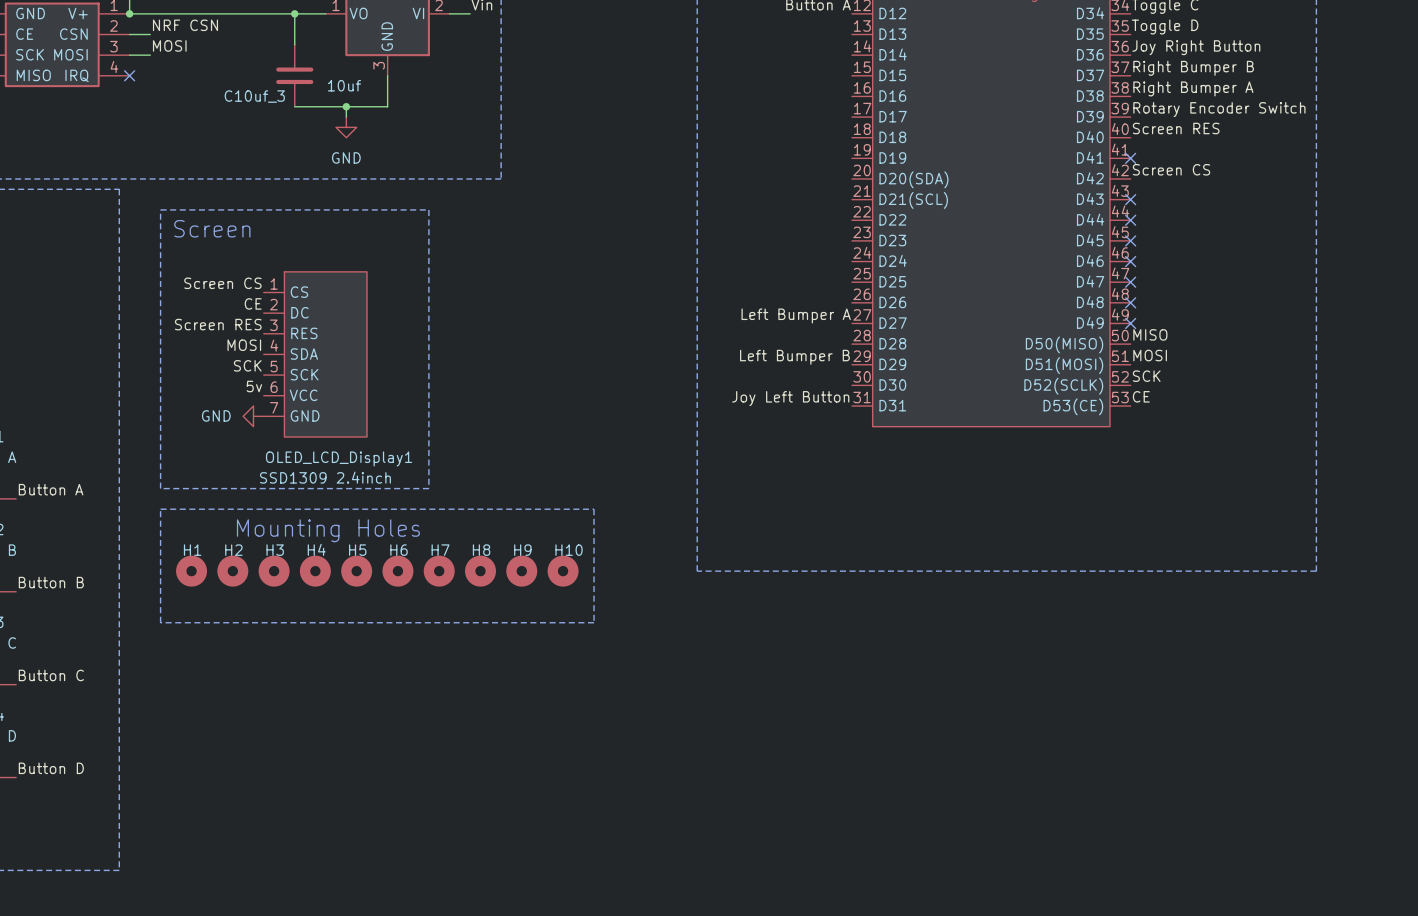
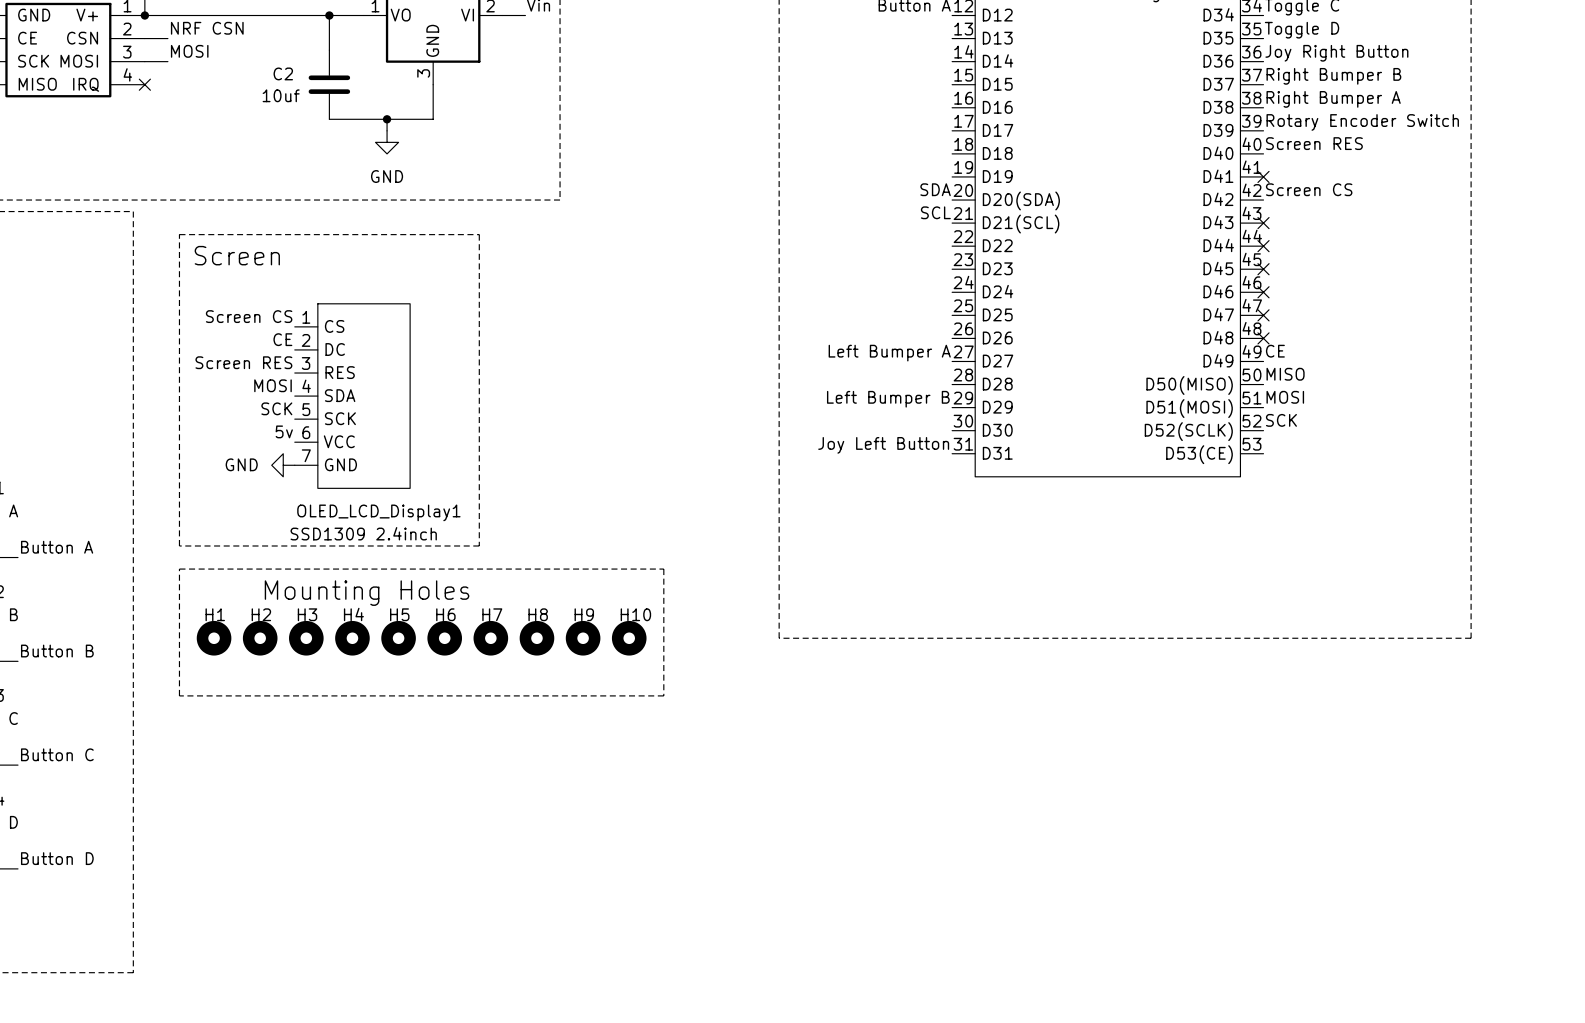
C10uf_3 value position: 10uf (344, 85) -> 10uf (281, 95)
C10uf_3 name: C10uf_3 (254, 96) -> C2 (283, 73)
label: none -> SDA (935, 189)
label: none -> SCL (935, 212)
no-connect mark: (1130, 323) -> none
label position: CE (1141, 396) -> CE (1275, 351)

